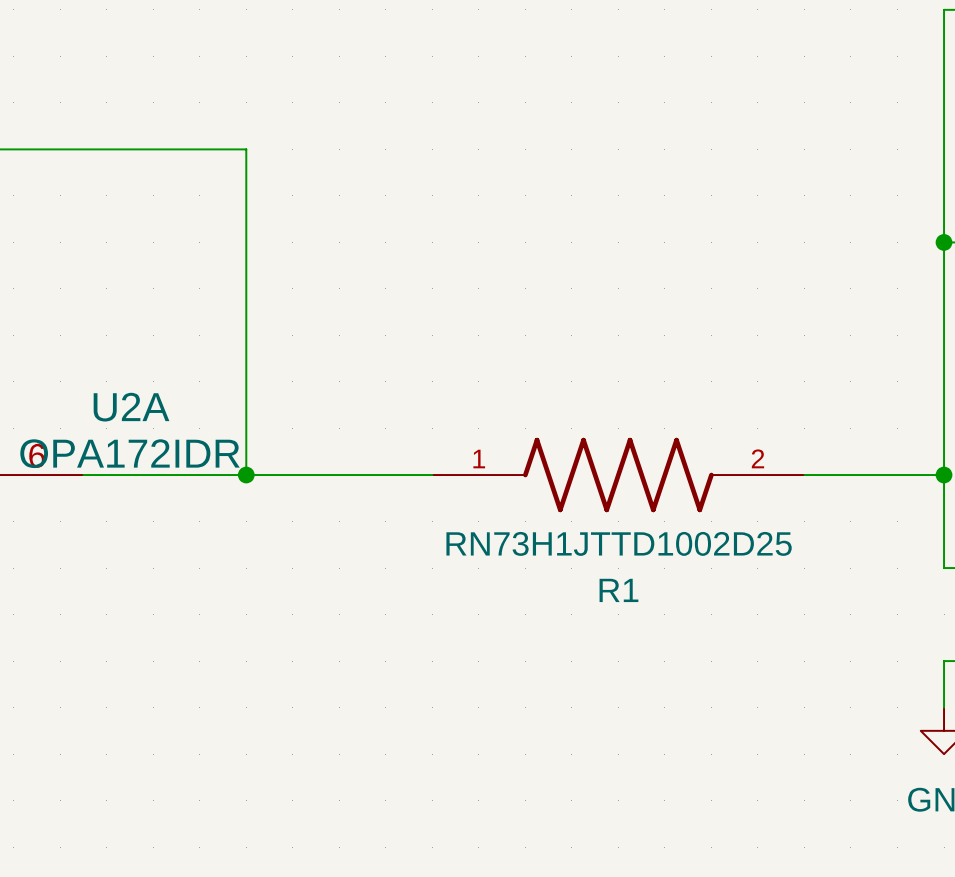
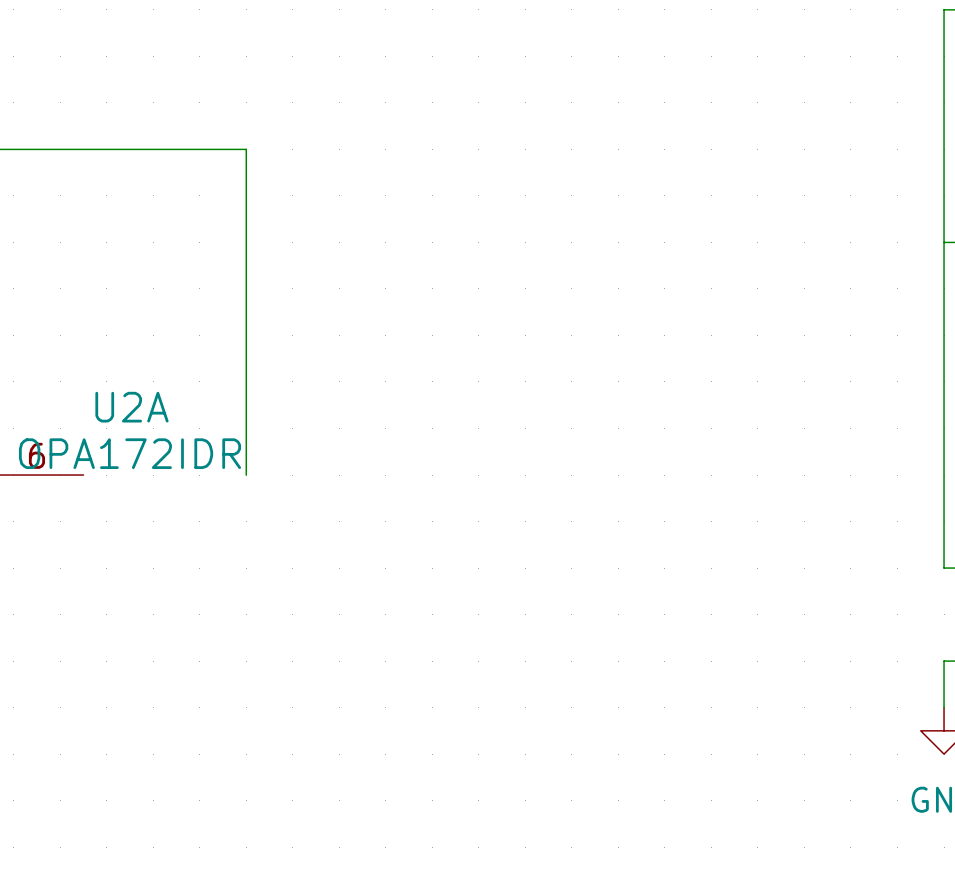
junction: (944, 242) -> none
wire: (83, 475) (432, 475) -> none
junction: (246, 475) -> none
R1: RN73H1JTTD1002D25 (618, 475) -> none
wire: (804, 475) (944, 475) -> none
junction: (944, 475) -> none

